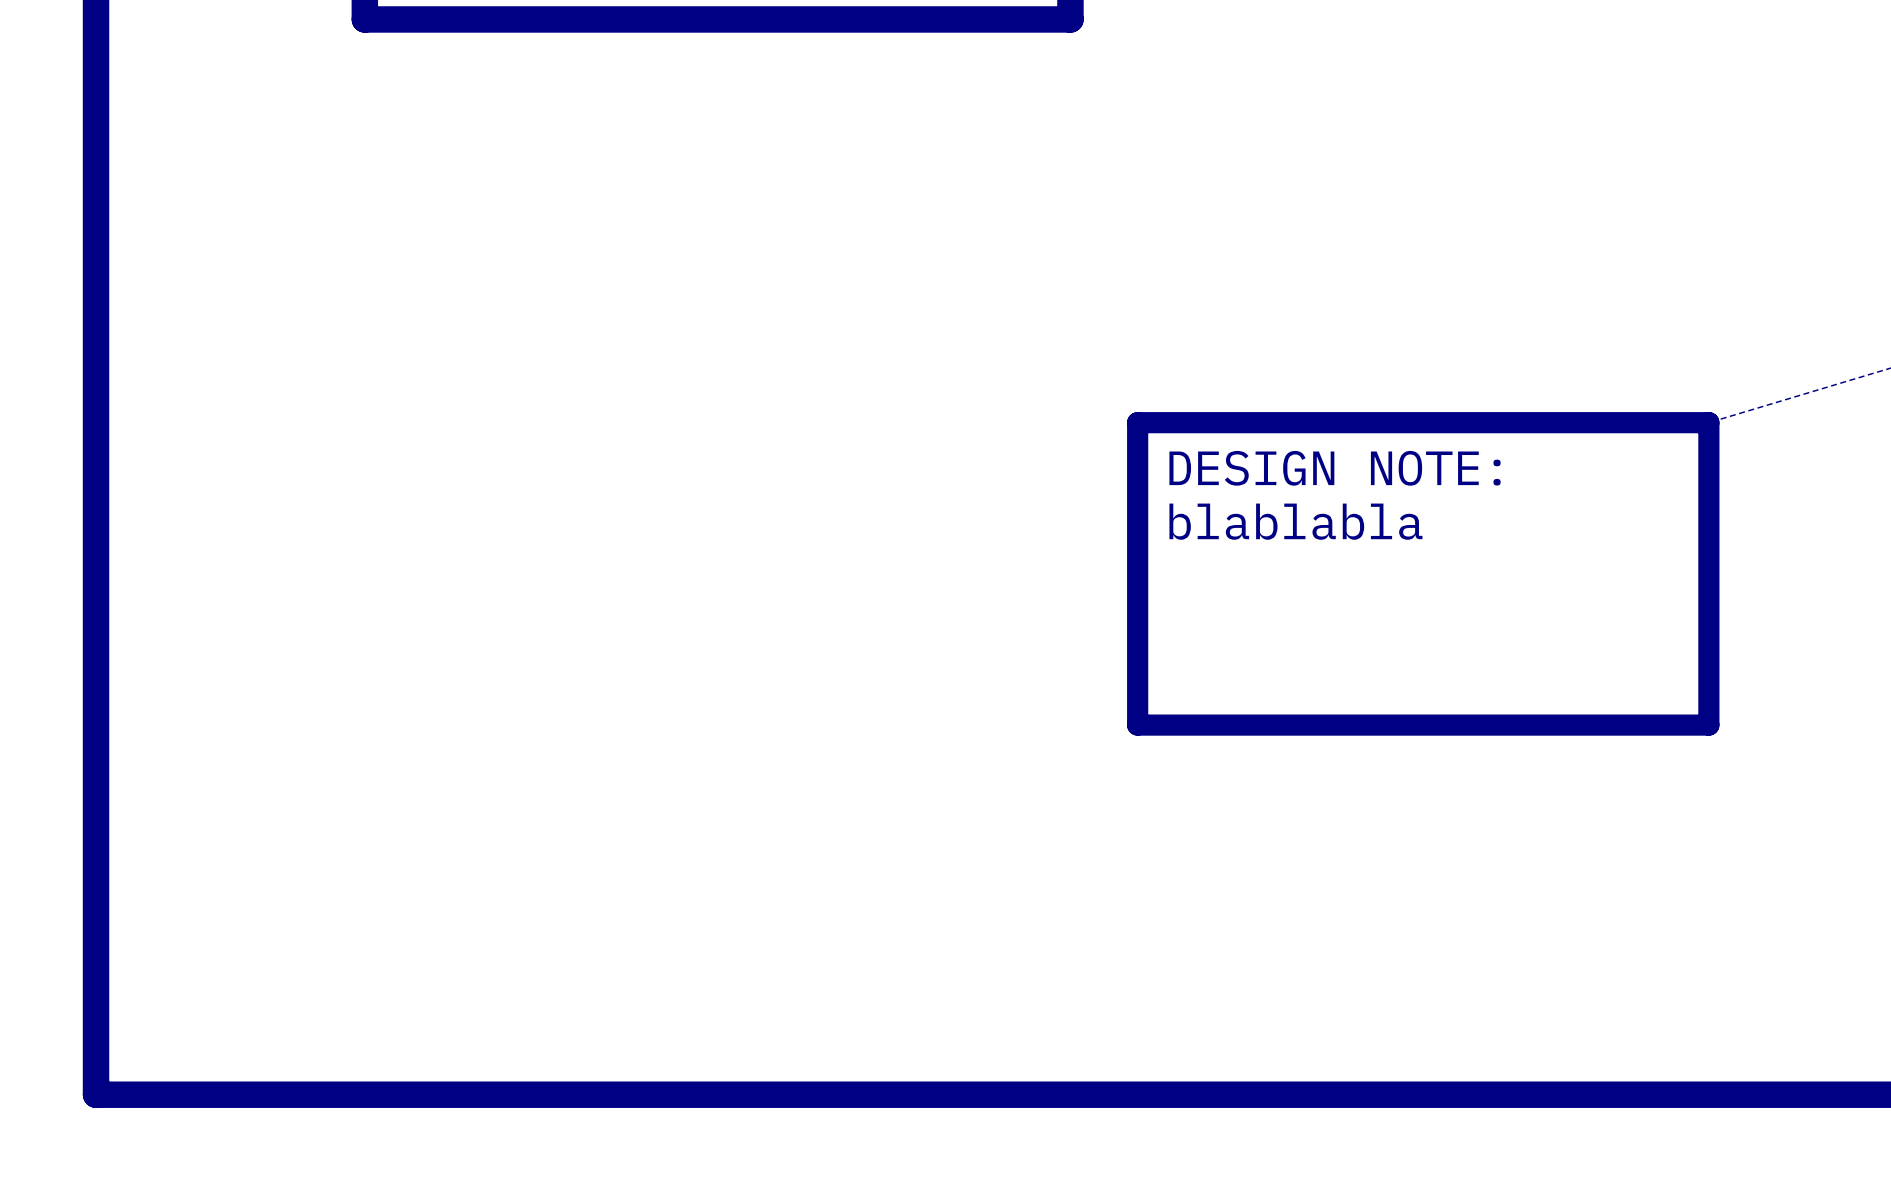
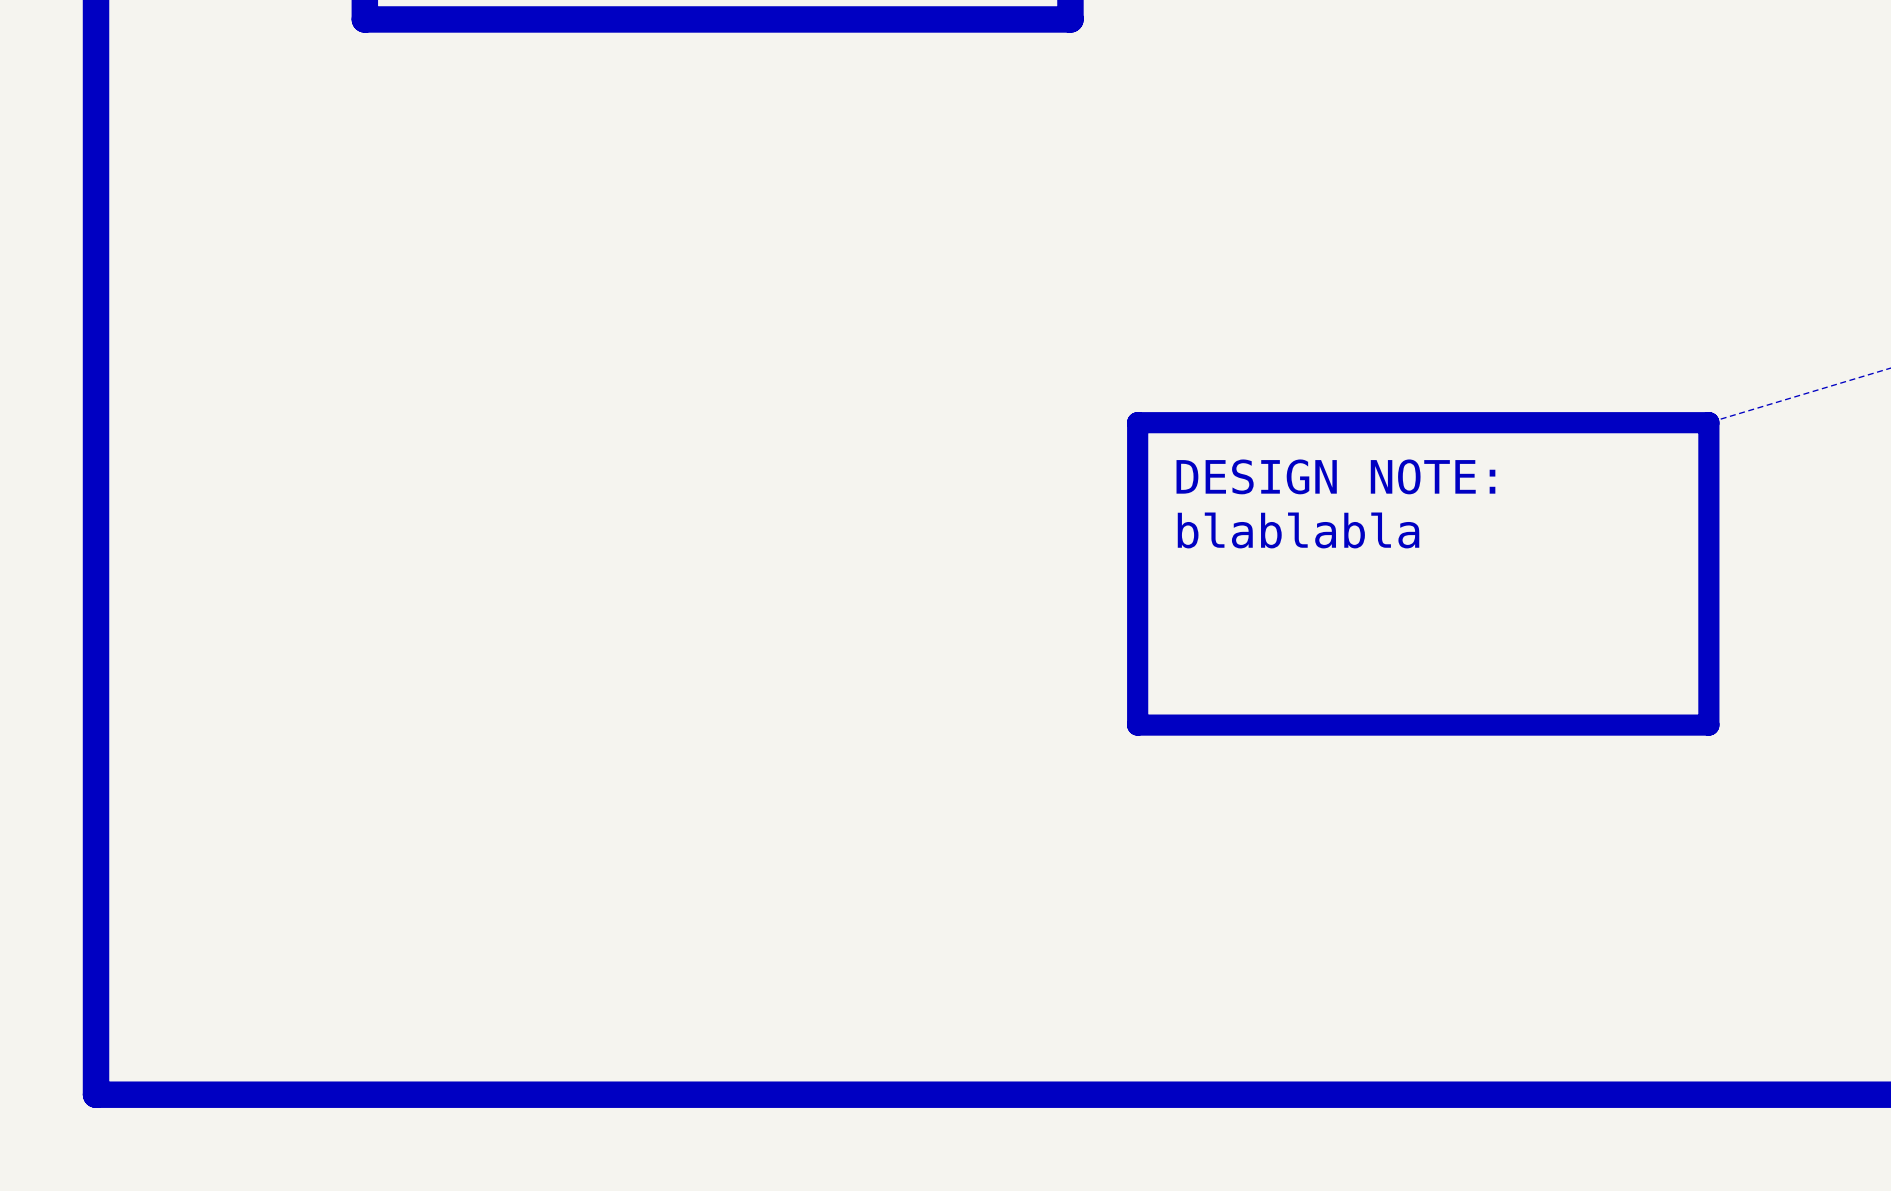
text position: DESIGN NOTE: (1335, 468) -> DESIGN NOTE: (1335, 476)
text position: blablabla (1295, 521) -> blablabla (1298, 530)

